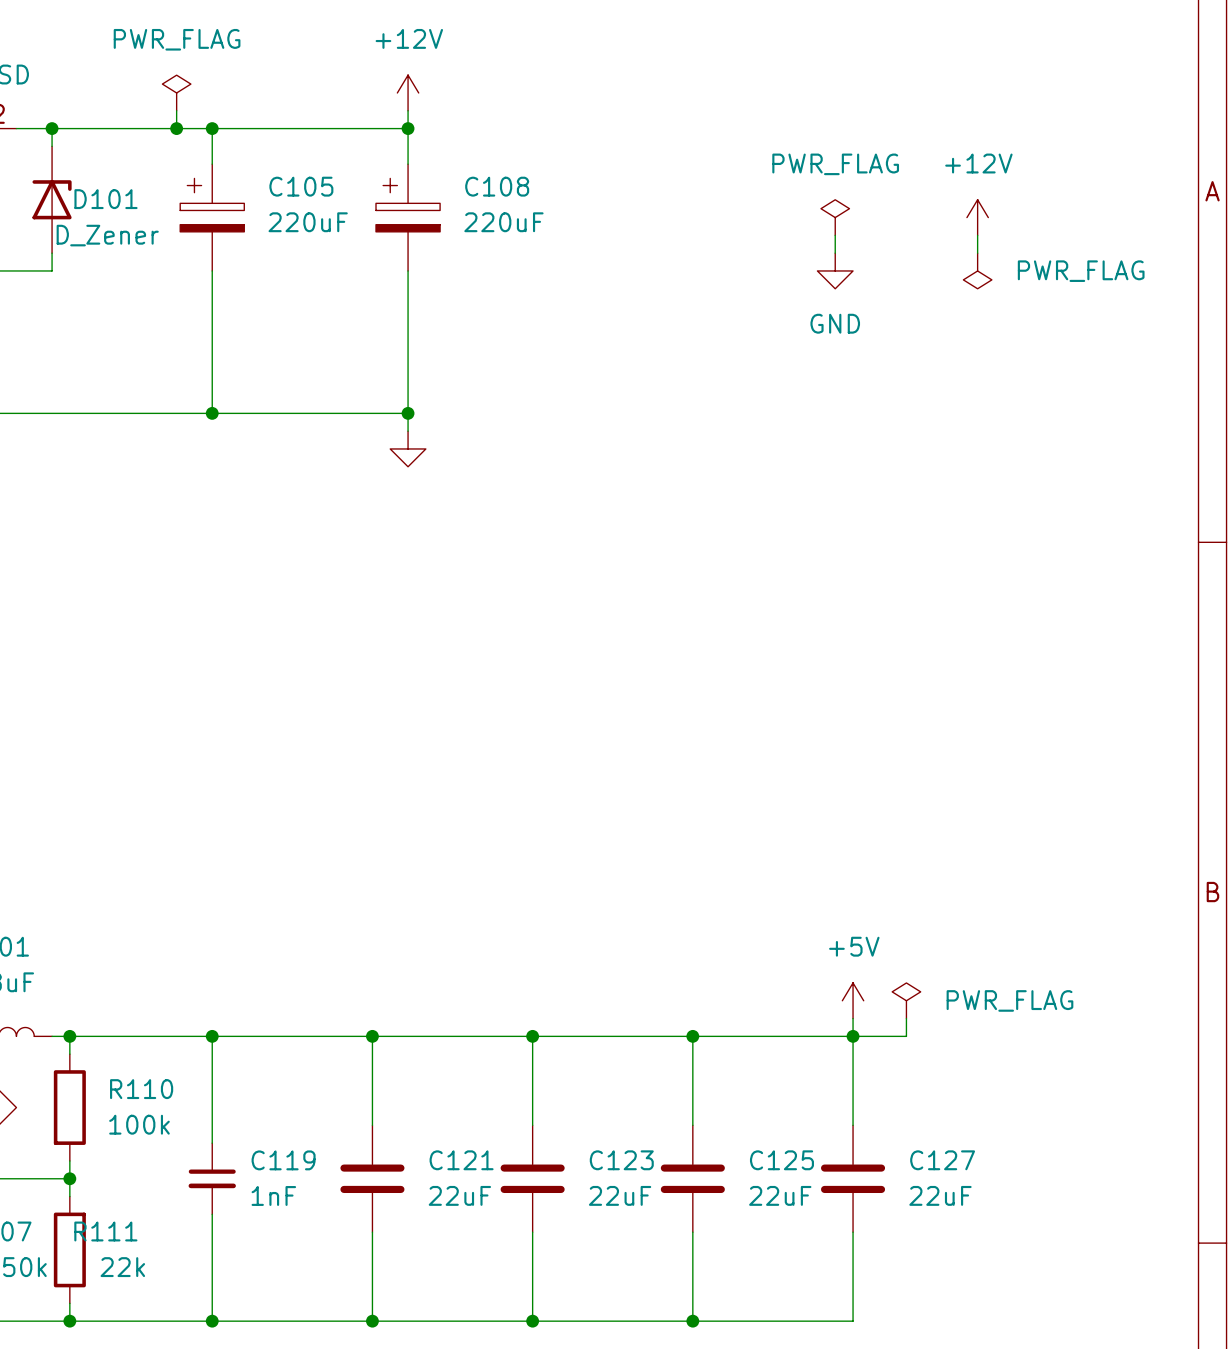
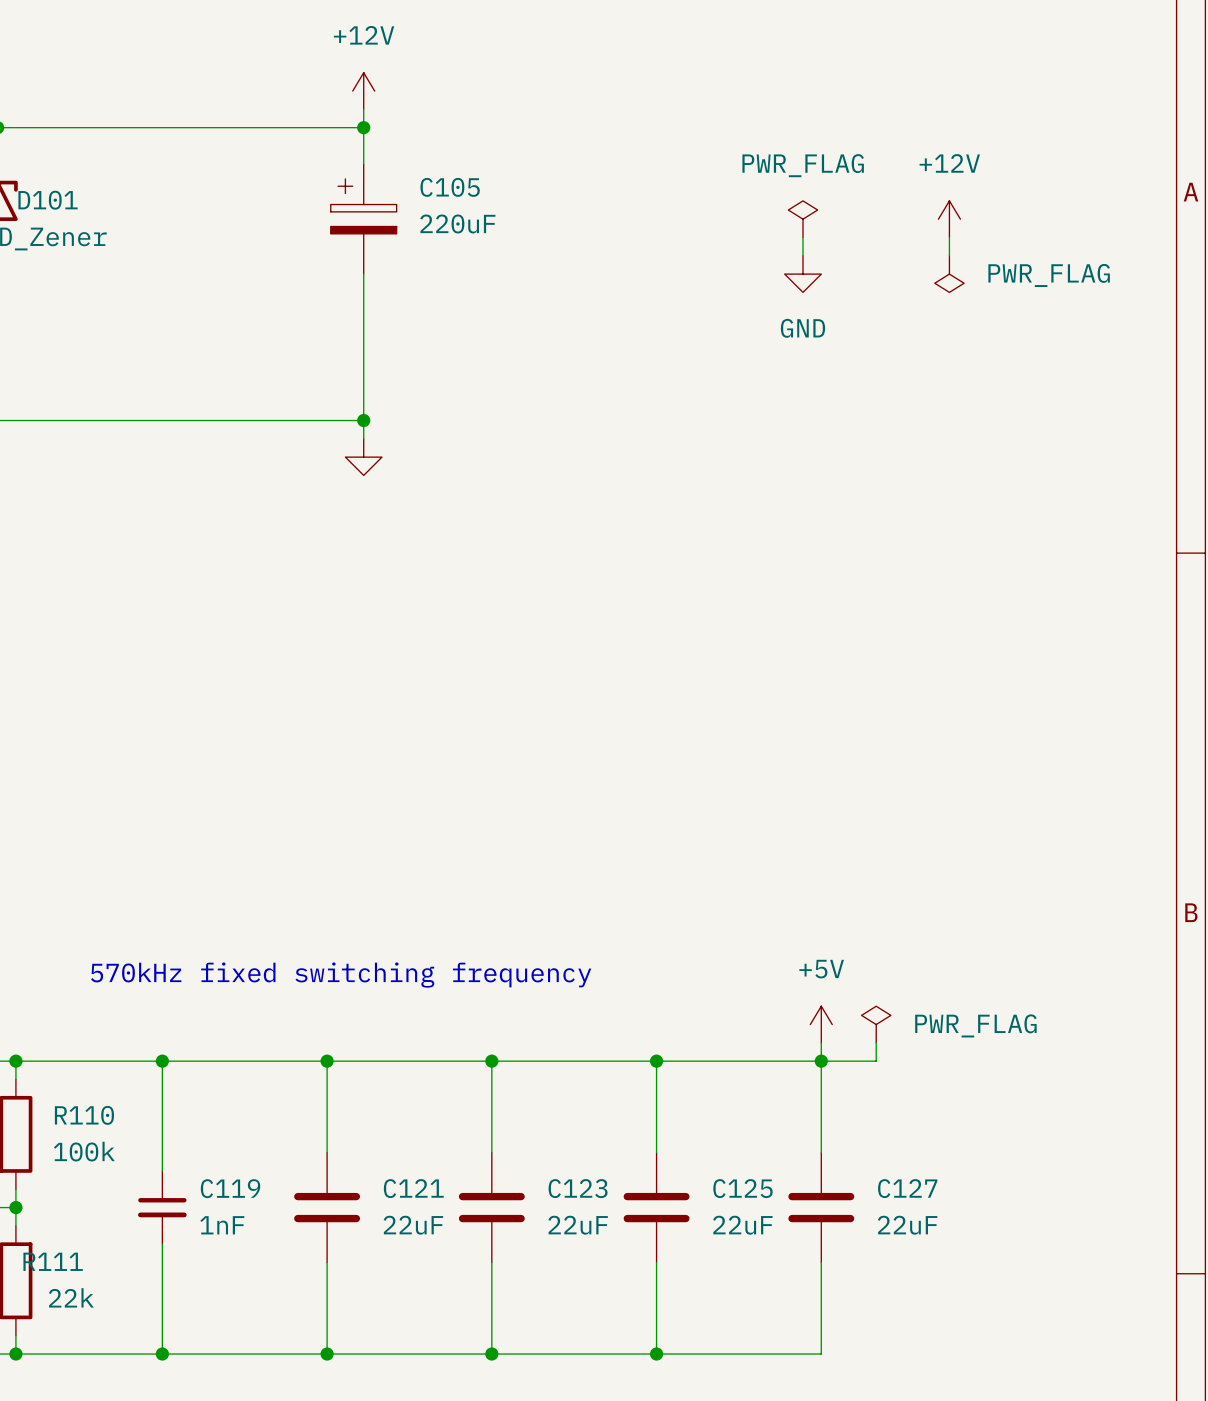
power symbol: PWR_FLAG (176, 92) -> none
wire: (176, 110) (176, 128) -> none
junction: (176, 128) -> none
wire: (212, 128) (212, 164) -> none
junction: (212, 128) -> none
C108 name: C108 (497, 186) -> C105 (450, 187)
C105: 220uF (212, 217) -> none
wire: (212, 270) (212, 413) -> none
junction: (212, 413) -> none
text: none -> 570kHz fixed switching frequency (341, 975)

